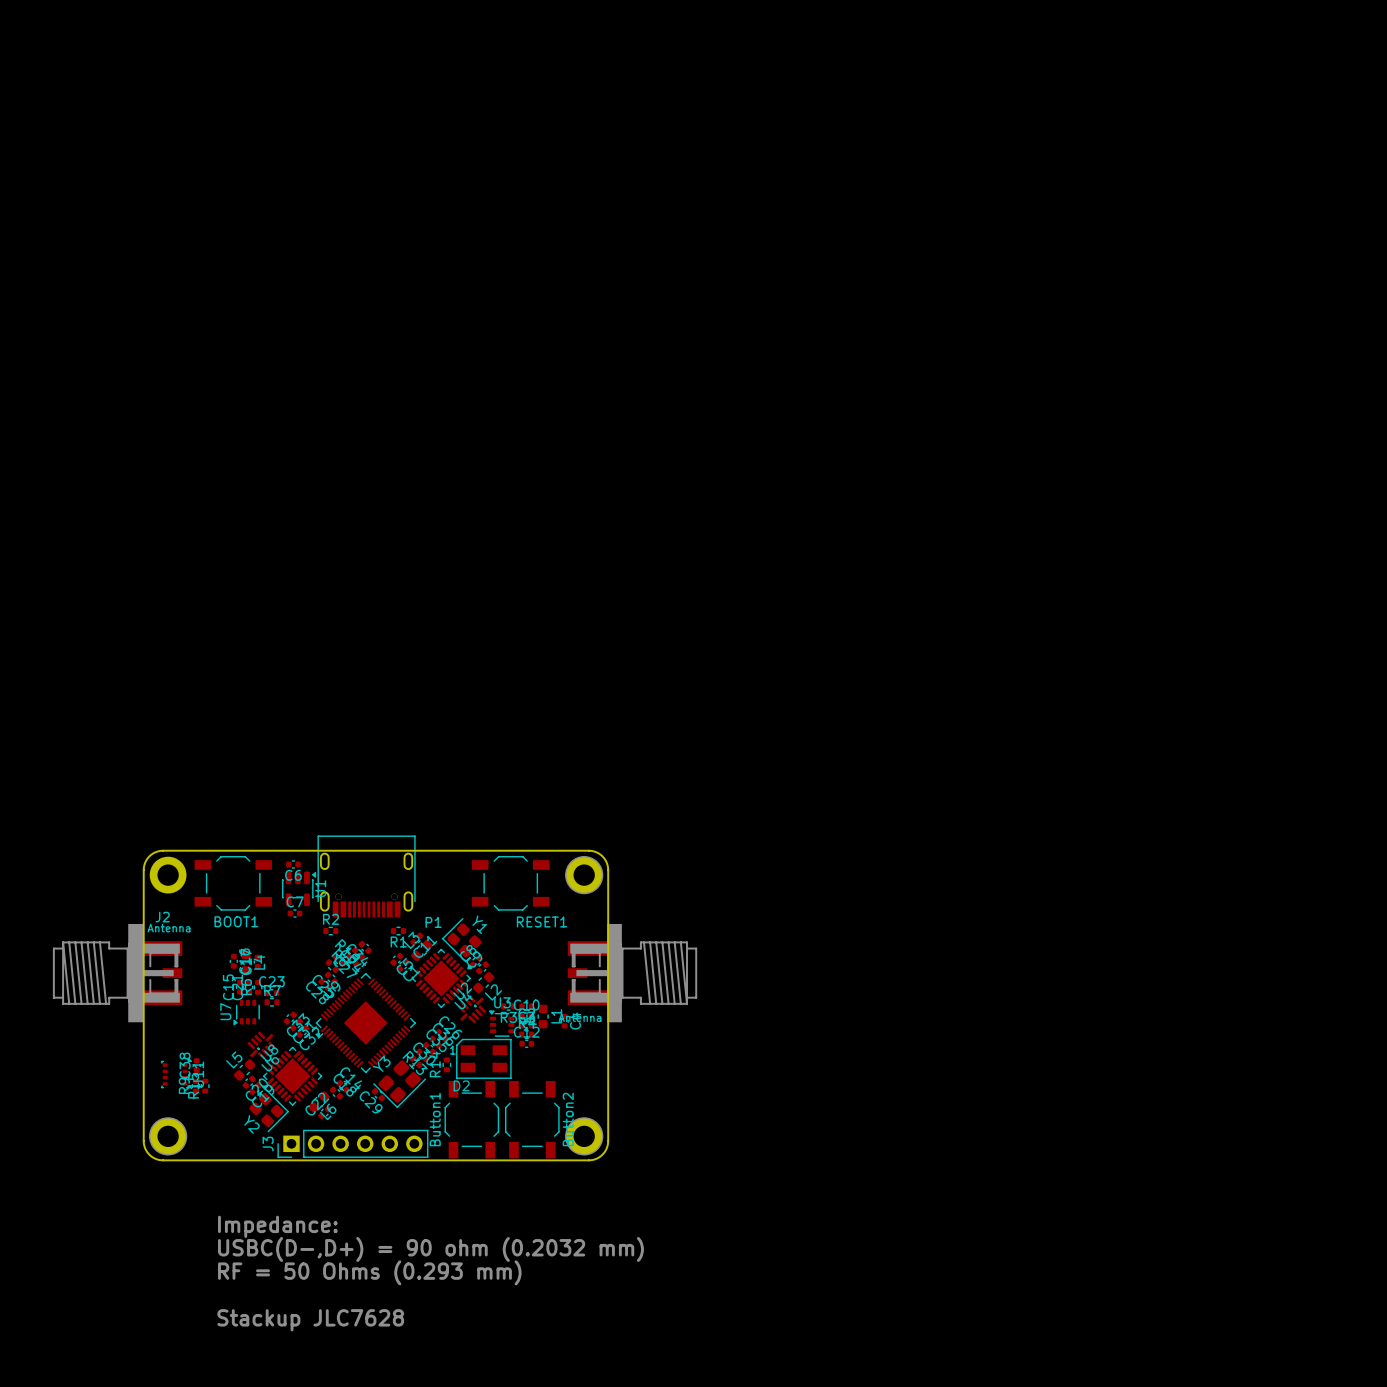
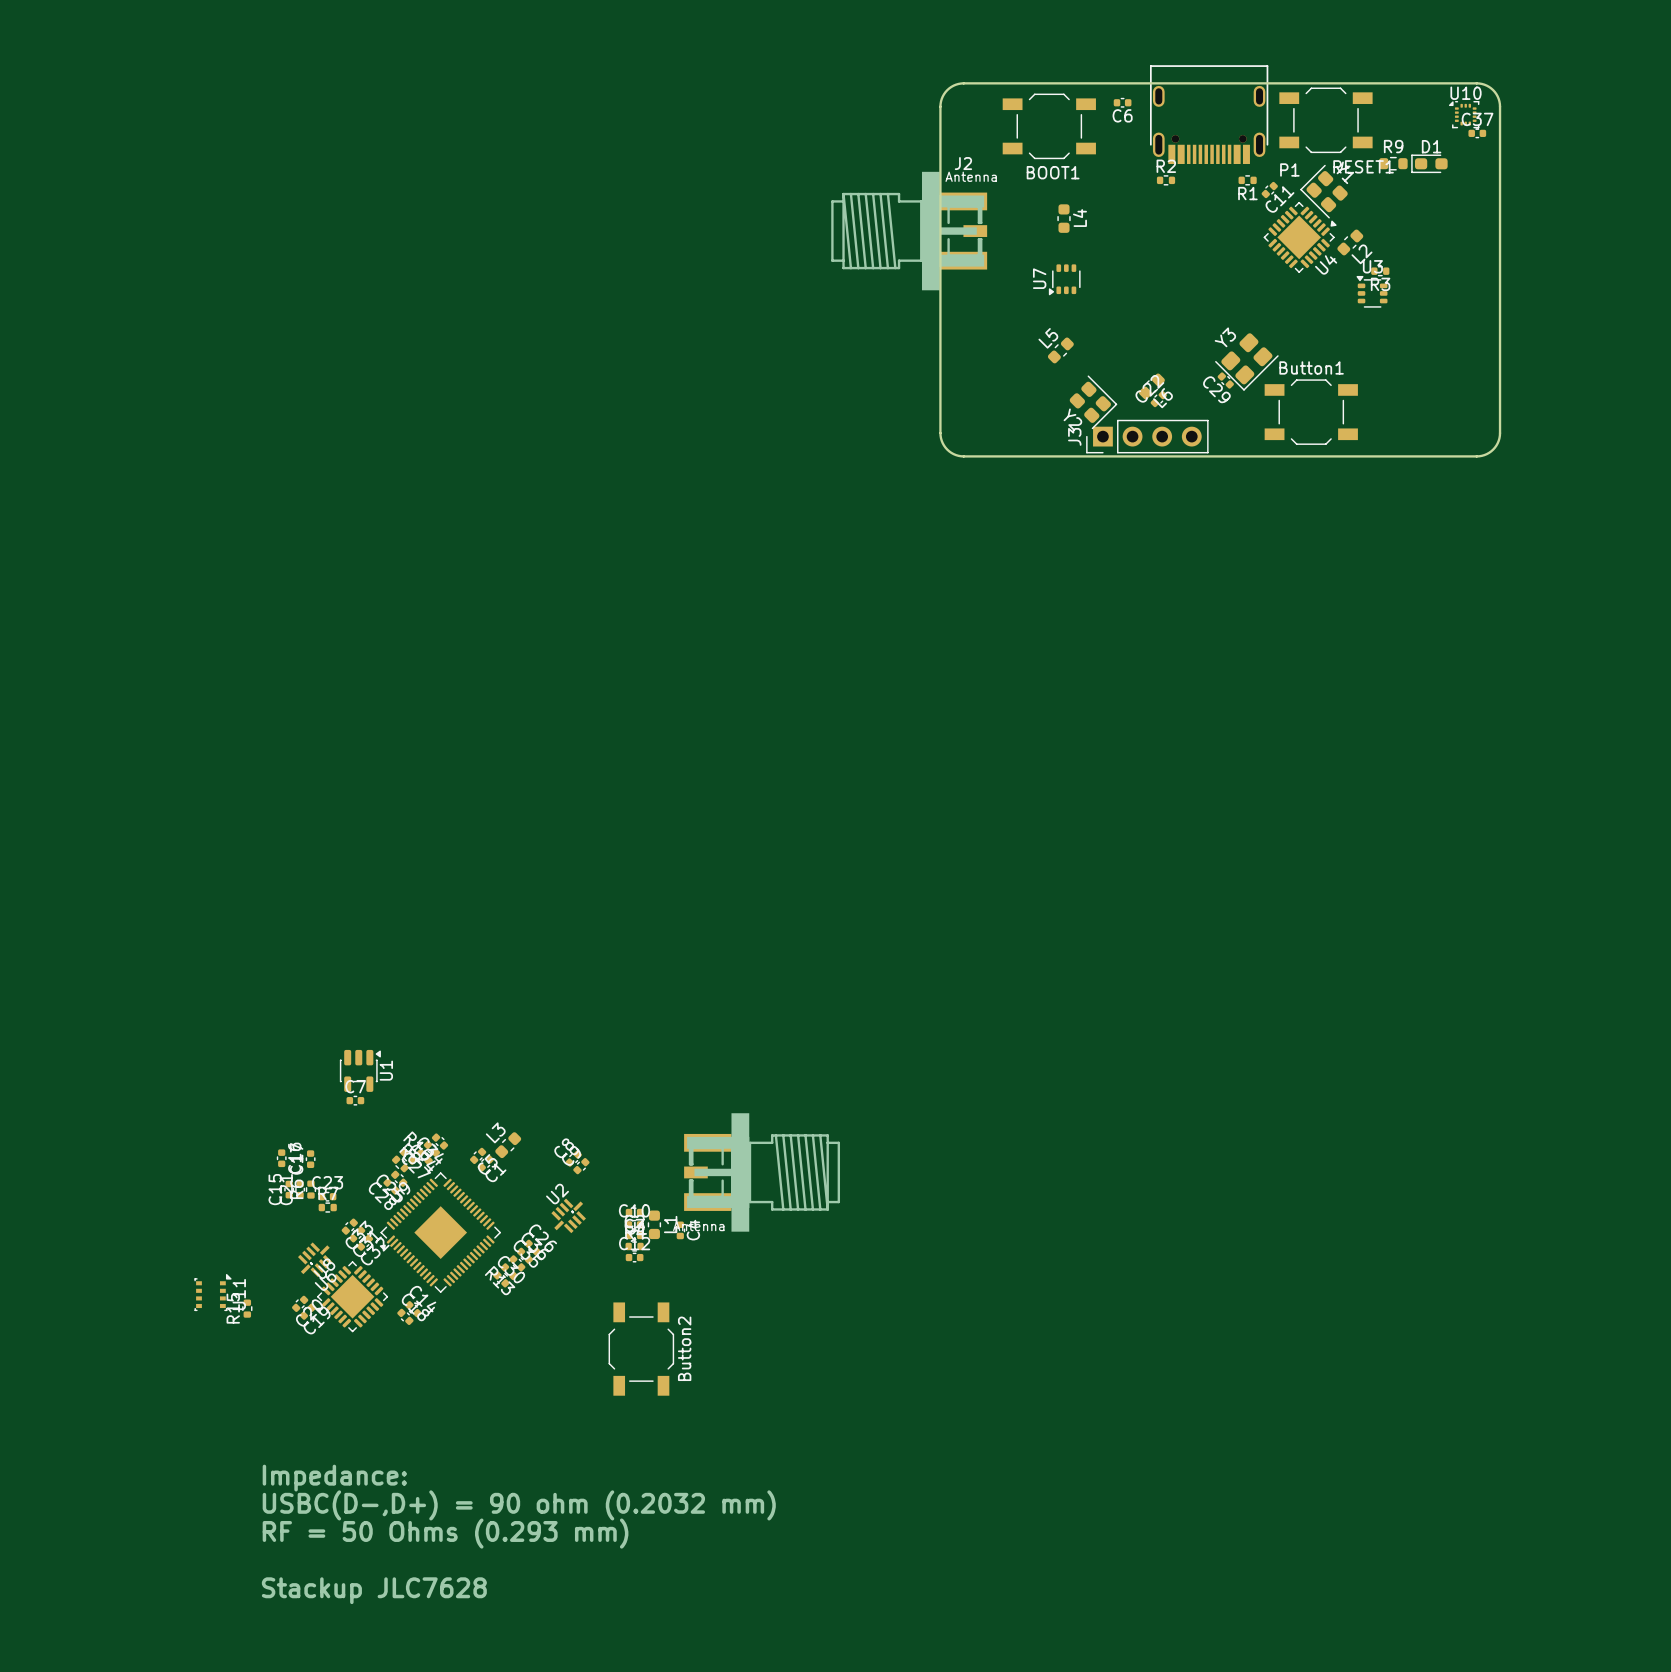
board edge: none -> (963, 83) (1476, 83) (1489, 86) (1497, 96) (1500, 106) (1500, 433) (1496, 445) (1486, 454) (1476, 456) (963, 456) (951, 452) (944, 445) (940, 433) (940, 106) (941, 98) (947, 90) (956, 84) (963, 83)
U10: none -> (1464, 114)
C37: none -> (1477, 133)
D1: none -> (1429, 163)
board edge: (163, 850) (588, 850) (599, 853) (605, 859) (608, 870) (608, 1141) (605, 1151) (597, 1158) (588, 1160) (163, 1160) (152, 1157) (145, 1149) (143, 1141) (143, 870) (149, 856) (163, 850) -> none
C6 position: (293, 864) -> (1122, 102)
part: (168, 875) -> none
part: (584, 875) -> none
P1 position: (366, 876) -> (1209, 114)
BOOT1 position: (233, 883) -> (1049, 126)
RESET1 position: (510, 883) -> (1325, 120)
R2 position: (330, 931) -> (1166, 180)
R1 position: (398, 931) -> (1247, 180)
C11 position: (416, 939) -> (1269, 190)
Y1 position: (461, 940) -> (1324, 191)
L4 position: (246, 962) -> (1064, 218)
J2 position: (117, 973) -> (909, 231)
U4 position: (442, 978) -> (1300, 237)
L2 position: (483, 982) -> (1350, 242)
R3 position: (508, 1006) -> (1380, 271)
U7 position: (246, 1012) -> (1064, 279)
U3 position: (501, 1023) -> (1371, 291)
D2: (483, 1058) -> none
R14: (446, 1064) -> none
C38: (196, 1065) -> none
L5 position: (244, 1070) -> (1060, 350)
R9 footprint: [191, 1078, 201, 1094] -> [1379, 156, 1408, 171]
Y3 position: (399, 1084) -> (1246, 361)
C29 position: (378, 1094) -> (1225, 380)
L6 position: (319, 1102) -> (1151, 386)
Y2 position: (269, 1109) -> (1093, 402)
C22 position: (324, 1112) -> (1158, 399)
Button1 rotation: 0° (471, 1119) -> 90° clockwise (1311, 412)
Button1 position: (471, 1119) -> (1311, 412)
J3 footprint: [277, 1129, 429, 1158] -> [1086, 419, 1209, 454]
part: (168, 1136) -> none
part: (584, 1136) -> none
J3 name position: J3 (268, 1144) -> J3 (1074, 436)

